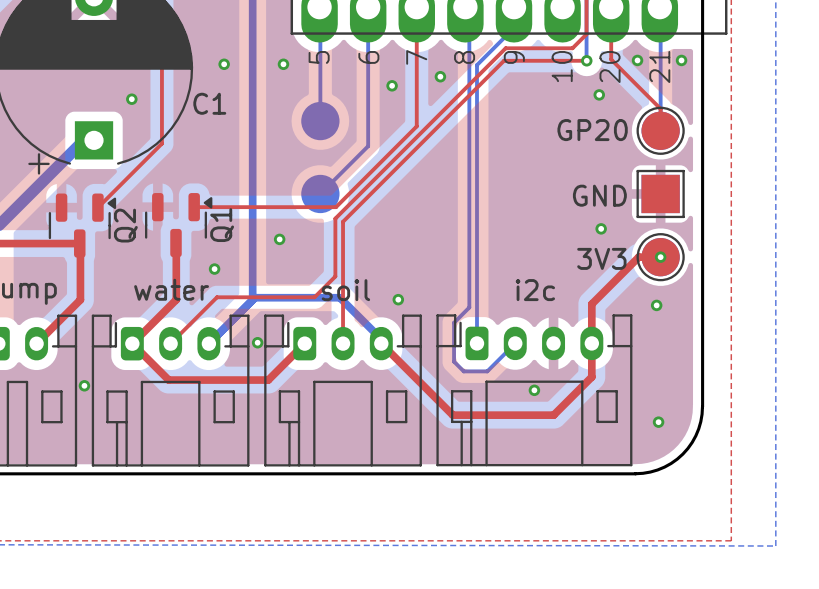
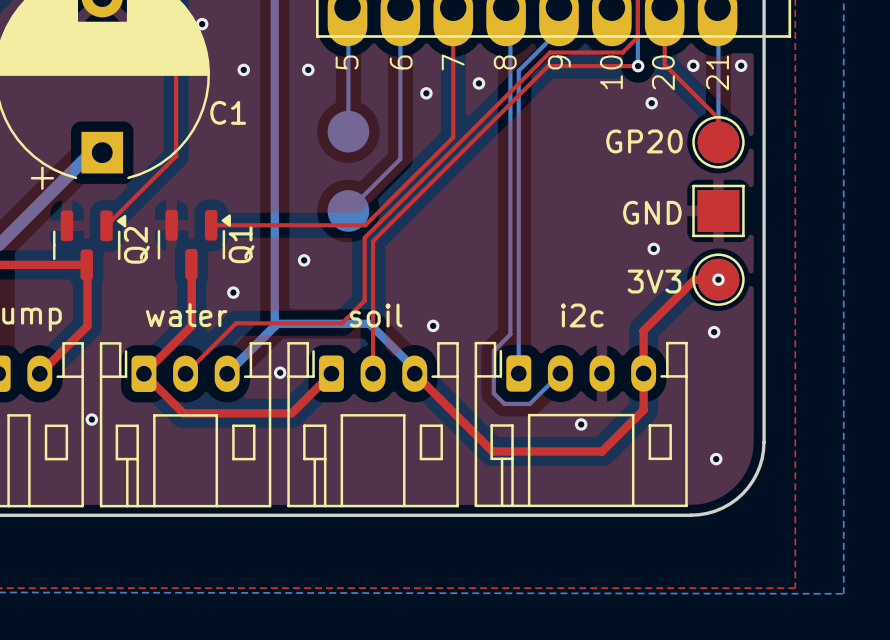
via position: (131, 99) -> (202, 24)

